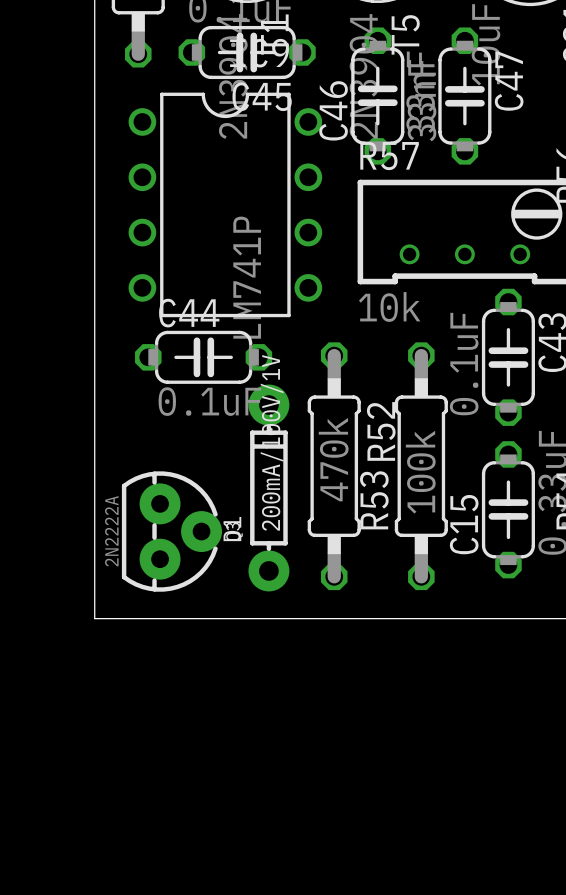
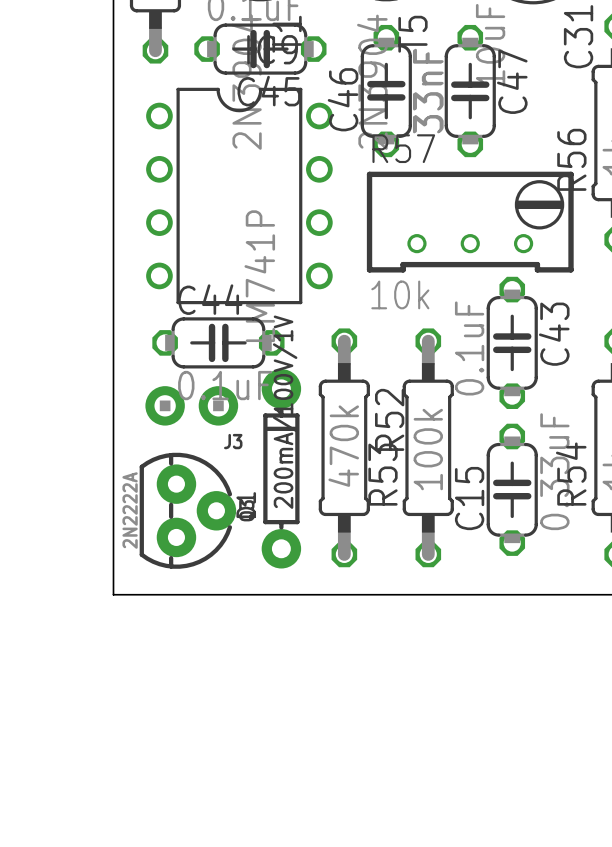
J3: none -> (191, 405)

